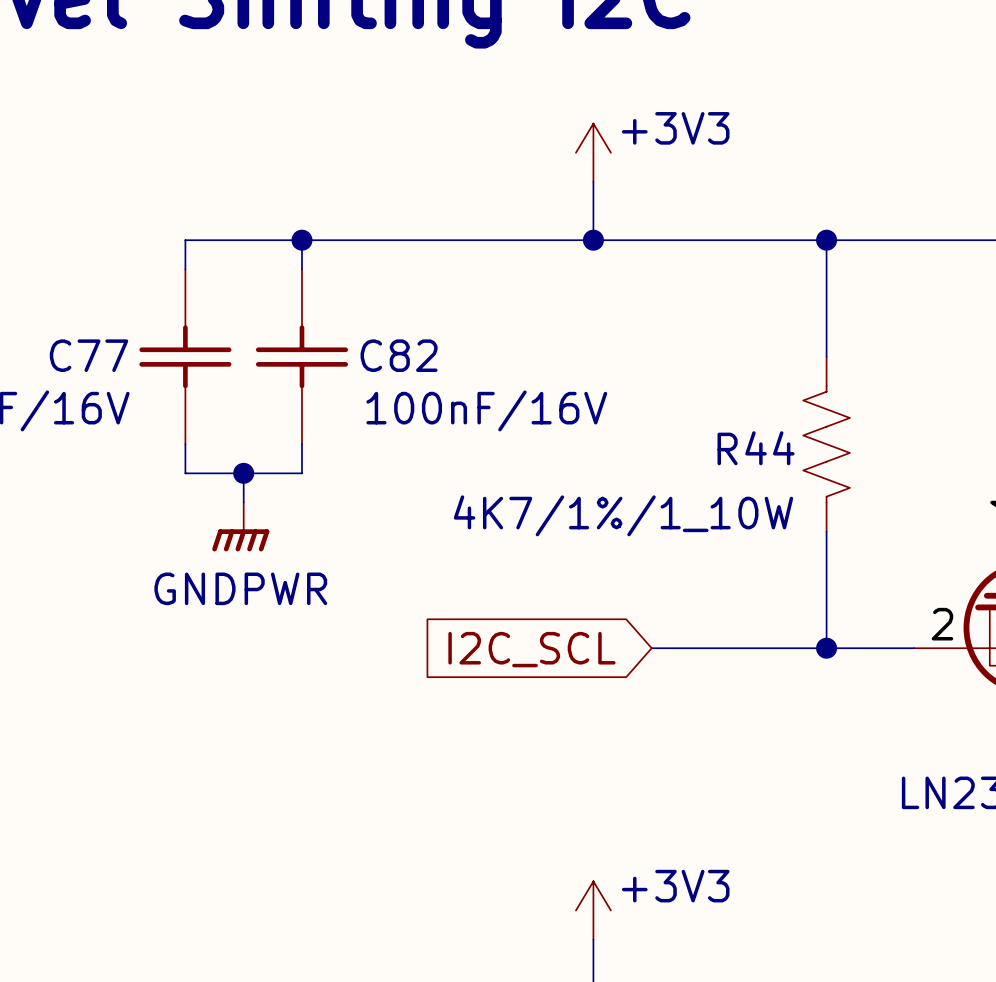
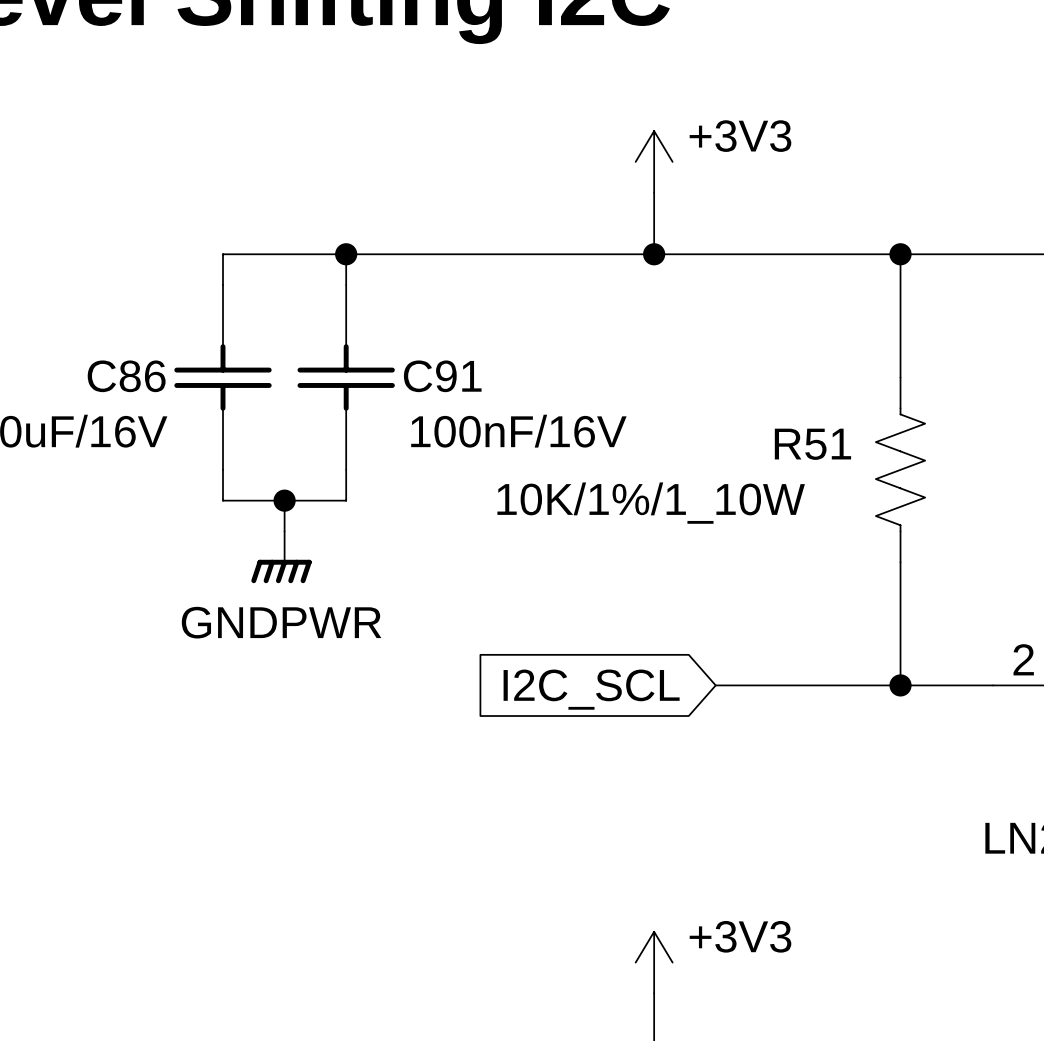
C77 name: C77 (89, 355) -> C86 (126, 376)
C82 name: C82 (399, 355) -> C91 (442, 376)
R44: 4K7/1%/1_10W (826, 444) -> none
R51: none -> 10K/1%/1_10W (900, 469)

